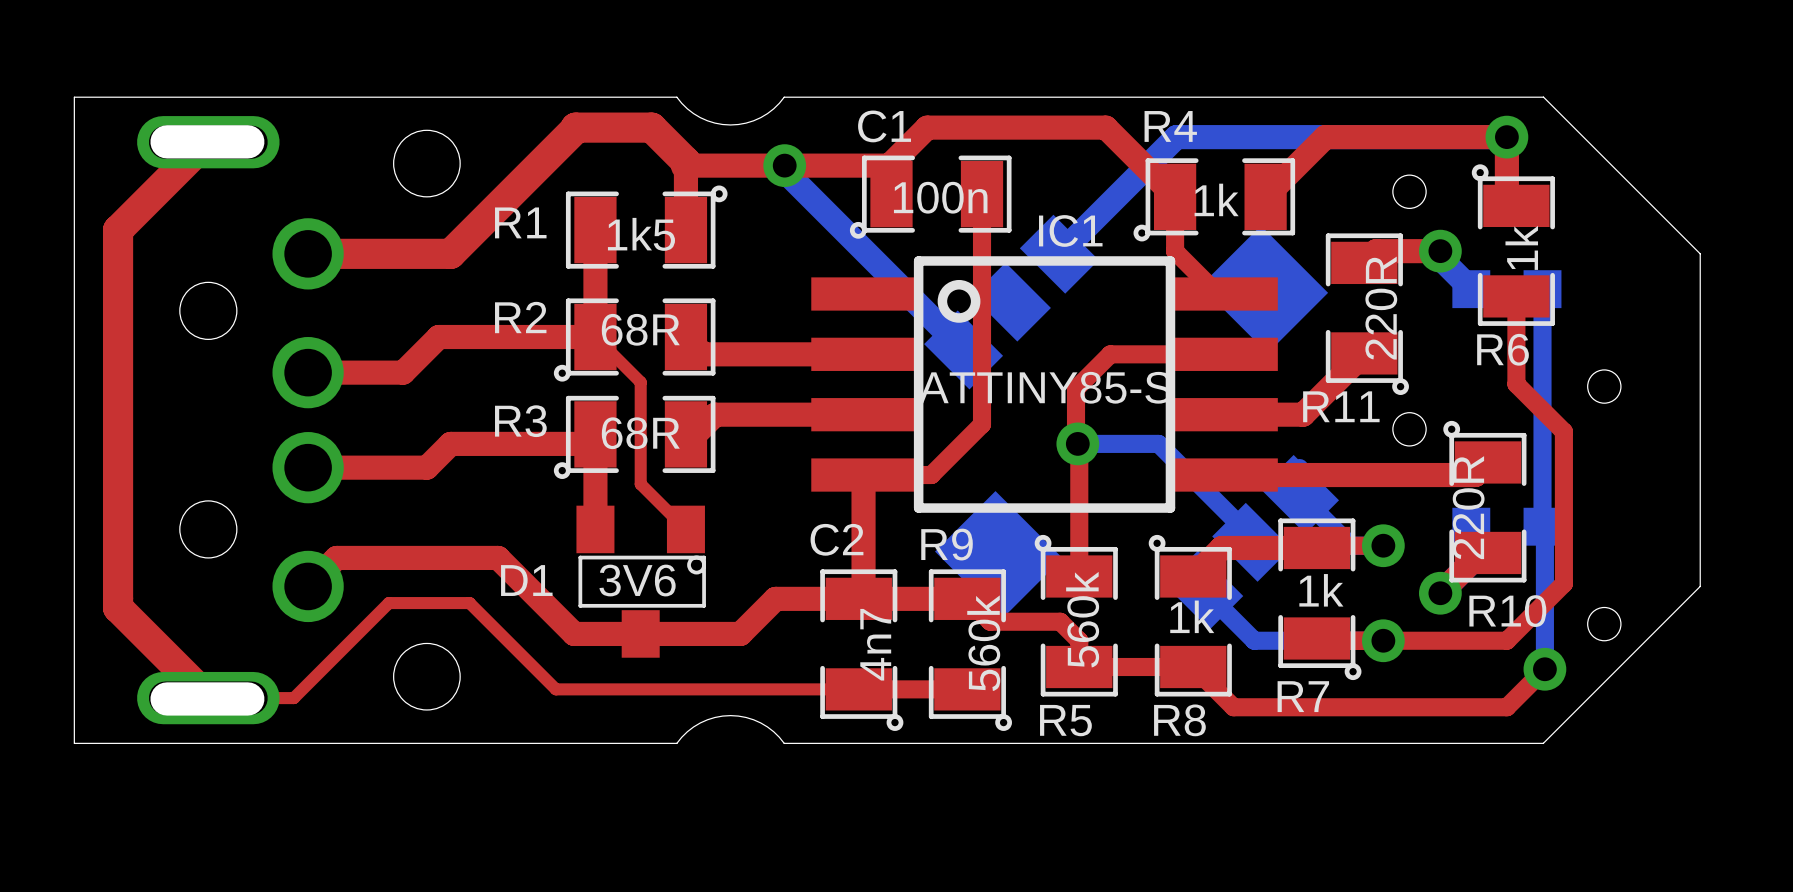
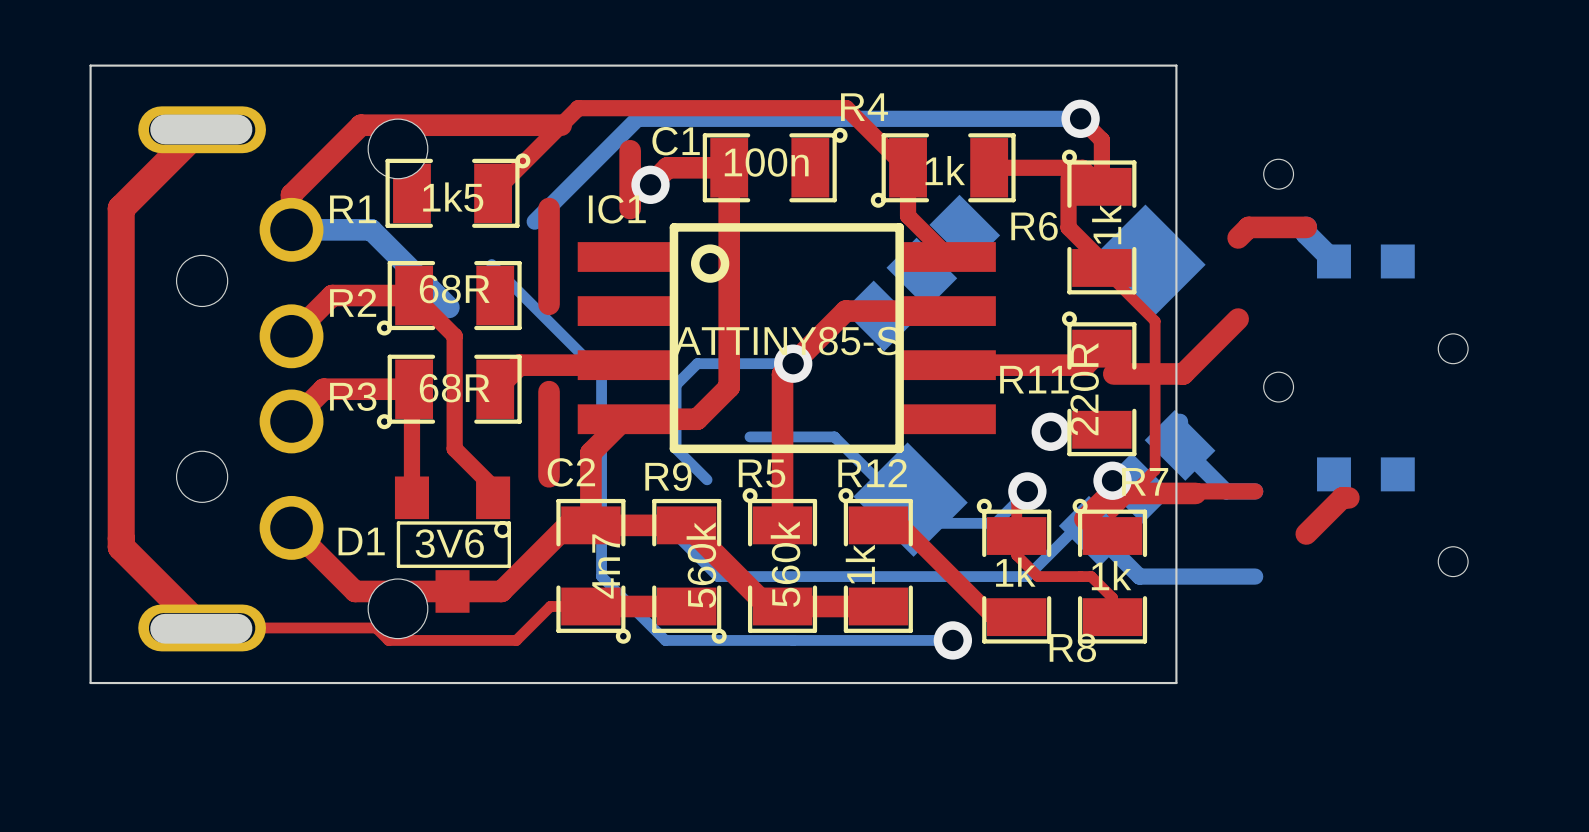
board edge: (74, 97) (676, 97) (687, 108) (700, 117) (715, 123) (730, 124) (746, 123) (760, 117) (773, 108) (784, 97) (1543, 97) (1700, 253) (1700, 586) (1543, 743) (784, 743) (773, 731) (760, 722) (746, 717) (730, 715) (714, 717) (700, 722) (687, 731) (676, 743) (74, 743) (74, 97) -> (90, 65) (90, 683) (1176, 683) (1176, 65) (90, 65)
R4 name position: R4 (1170, 126) -> R4 (864, 107)
top track: none -> (1080, 118) (1101, 140) (1101, 186) (1082, 167) (989, 167)
bottom track: none -> (1080, 118) (637, 118) (534, 221)
via: none -> (1080, 118)
bottom track: (1506, 137) (1176, 137) (1059, 254) -> none
via: (1506, 137) -> none
bottom track: (784, 165) (784, 171) (963, 349) -> none
via position: (784, 165) -> (650, 184)
top track: (889, 165) (685, 165) (685, 161) (651, 127) (575, 127) (450, 253) (308, 253) -> (561, 125) (360, 125) (291, 194) (291, 229)
top track: (889, 165) (927, 127) (1105, 127) (1175, 196) (1170, 192) -> none
top track: (982, 194) (982, 424) (931, 475) (863, 475) (863, 594) (858, 598) -> none
top track: (1265, 196) (1325, 137) (1506, 137) (1506, 196) (1516, 205) -> none
C1 rotation: 0° (930, 197) -> 180° (775, 165)
R4 position: (1214, 199) -> (943, 170)
top track: none -> (650, 184) (667, 167) (729, 167) (729, 387) (697, 419) (624, 419) (590, 452) (590, 525)
top track: none -> (493, 193) (578, 108) (846, 108) (908, 167) (908, 216) (949, 257)
R1 name position: R1 (520, 222) -> R1 (353, 209)
R1 position: (646, 227) -> (457, 190)
IC1 name position: IC1 (1070, 230) -> IC1 (617, 209)
R6 position: (1513, 245) -> (1099, 222)
via: (1440, 251) -> none
bottom track: none -> (291, 229) (371, 229) (448, 307)
bottom track: (1542, 289) (1542, 526) (1544, 529) (1544, 669) -> none
bottom track: none -> (491, 264) (601, 374) (601, 576) (665, 640) (952, 640)
top track: none -> (1101, 267) (1155, 321) (1155, 470) (1112, 512)
top track: (1516, 296) (1516, 384) (1563, 431) (1563, 583) (1506, 640) (1319, 640) (1316, 638) -> none
R11 rotation: 0° (1367, 314) -> 180° (1099, 383)
R11 position: (1367, 314) -> (1099, 383)
R2 name position: R2 (520, 317) -> R2 (353, 302)
top track: (685, 337) (703, 354) (863, 354) -> none
R2 position: (634, 340) -> (449, 298)
top track: none -> (949, 311) (845, 311) (782, 374) (782, 525)
R6 name position: R6 (1503, 349) -> R6 (1034, 226)
top track: (1225, 354) (1110, 354) (1076, 388) (1076, 443) (1079, 445) (1079, 576) -> none
top track: (308, 372) (403, 372) (438, 337) (595, 337) (640, 382) (640, 484) (685, 529) -> (291, 336) (332, 295) (414, 295) (454, 336) (454, 448) (493, 487) (493, 497)
IC1 position: (1044, 384) -> (786, 338)
top track: none -> (1101, 348) (1085, 365) (949, 365)
bottom track: none -> (793, 363) (697, 363) (676, 384) (676, 448) (707, 479)
via: none -> (793, 363)
top track: none -> (624, 365) (519, 365) (495, 389)
R11 name position: R11 (1341, 406) -> R11 (1034, 379)
top track: (863, 414) (715, 414) (685, 443) -> none
R3 name position: R3 (520, 421) -> R3 (353, 396)
R3 position: (634, 437) -> (449, 391)
top track: (595, 443) (450, 443) (426, 467) (308, 467) -> (414, 389) (323, 389) (291, 421)
bottom track: (1077, 443) (1158, 443) (1254, 540) -> none
via: (1077, 443) -> none
top track: none -> (411, 406) (411, 497)
top track: (1487, 462) (1475, 475) (1225, 475) -> none
via: none -> (1050, 431)
bottom track: none -> (749, 436) (834, 436) (920, 523) (995, 523) (1027, 491)
R10: 220R (1484, 501) -> none
bottom track: none -> (1112, 480) (1112, 491) (1027, 576) (718, 576) (664, 522)
via: none -> (1112, 480)
top track: none -> (1027, 491) (1016, 502) (1016, 555) (1038, 576) (1091, 576) (1112, 597) (1112, 617)
via: none -> (1027, 491)
via: (1383, 545) -> none
D1 name position: D1 (526, 580) -> D1 (361, 541)
D1 position: (641, 581) -> (453, 544)
top track: none -> (878, 525) (901, 525) (993, 617) (1016, 617) (1012, 617)
top track: (308, 586) (336, 557) (498, 557) (574, 633) (740, 633) (775, 598) (967, 598) (990, 621) (1060, 621) (1079, 640) (1079, 667) (1193, 667) -> (291, 527) (355, 591) (501, 591) (567, 525) (686, 525) (767, 606) (878, 606)
via: (1440, 593) -> none
R7 rotation: 0° (1319, 599) -> 180° (1109, 571)
R7 position: (1319, 599) -> (1109, 571)
R5 position: (1076, 615) -> (779, 560)
R8 position: (1190, 615) -> (1014, 571)
R12: none -> 1k (875, 560)
via: (1383, 640) -> none
C2 position: (861, 650) -> (593, 571)
R9 position: (970, 650) -> (689, 571)
top track: (1193, 667) (1233, 707) (1506, 707) (1544, 669) -> none
via: (1544, 669) -> none
top track: (967, 689) (555, 689) (469, 603) (388, 603) (293, 698) -> (686, 606) (550, 606) (516, 640) (388, 640) (376, 627) (278, 627)
via: none -> (952, 640)
R5 name position: R5 (1065, 720) -> R5 (762, 473)

